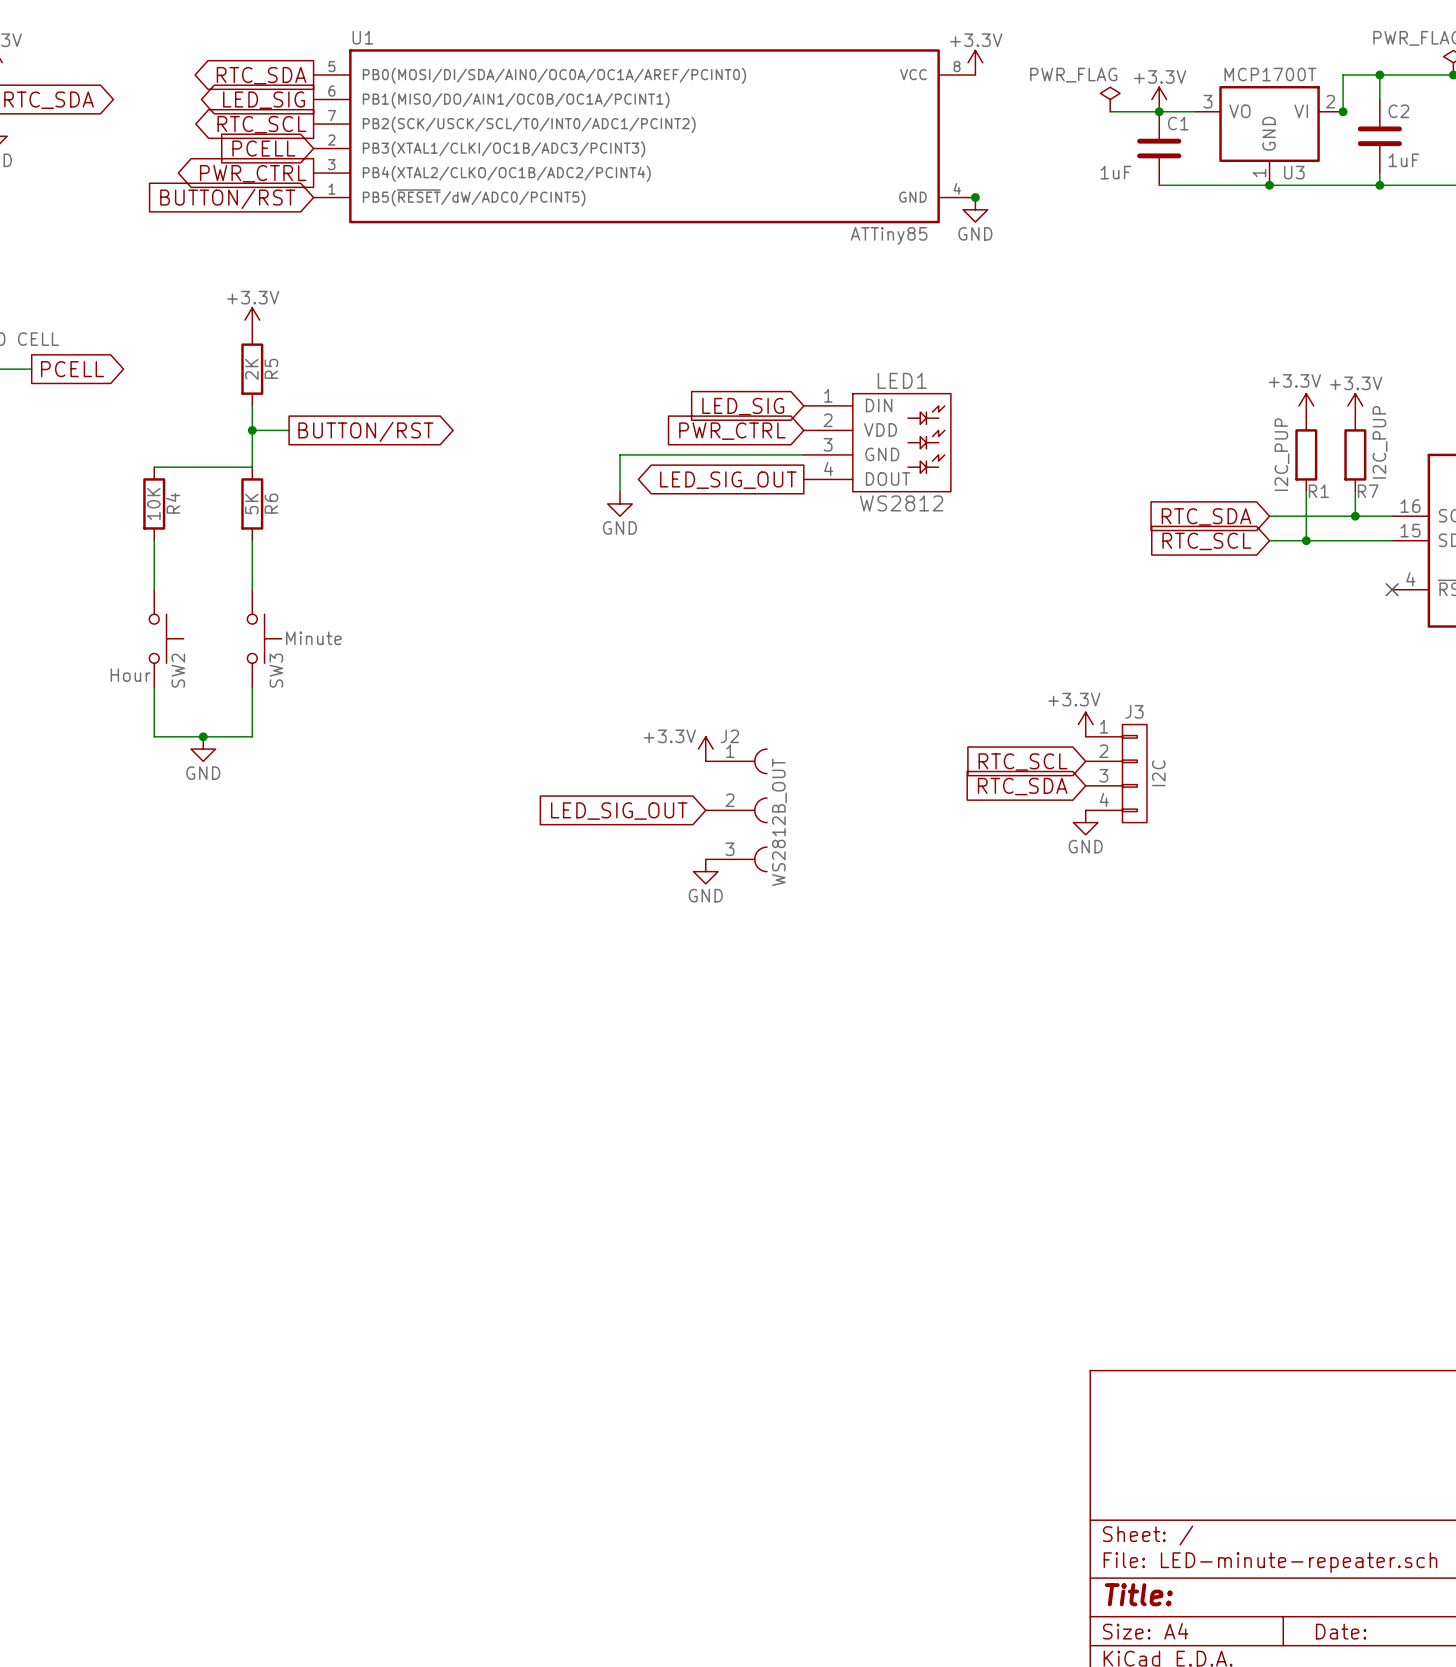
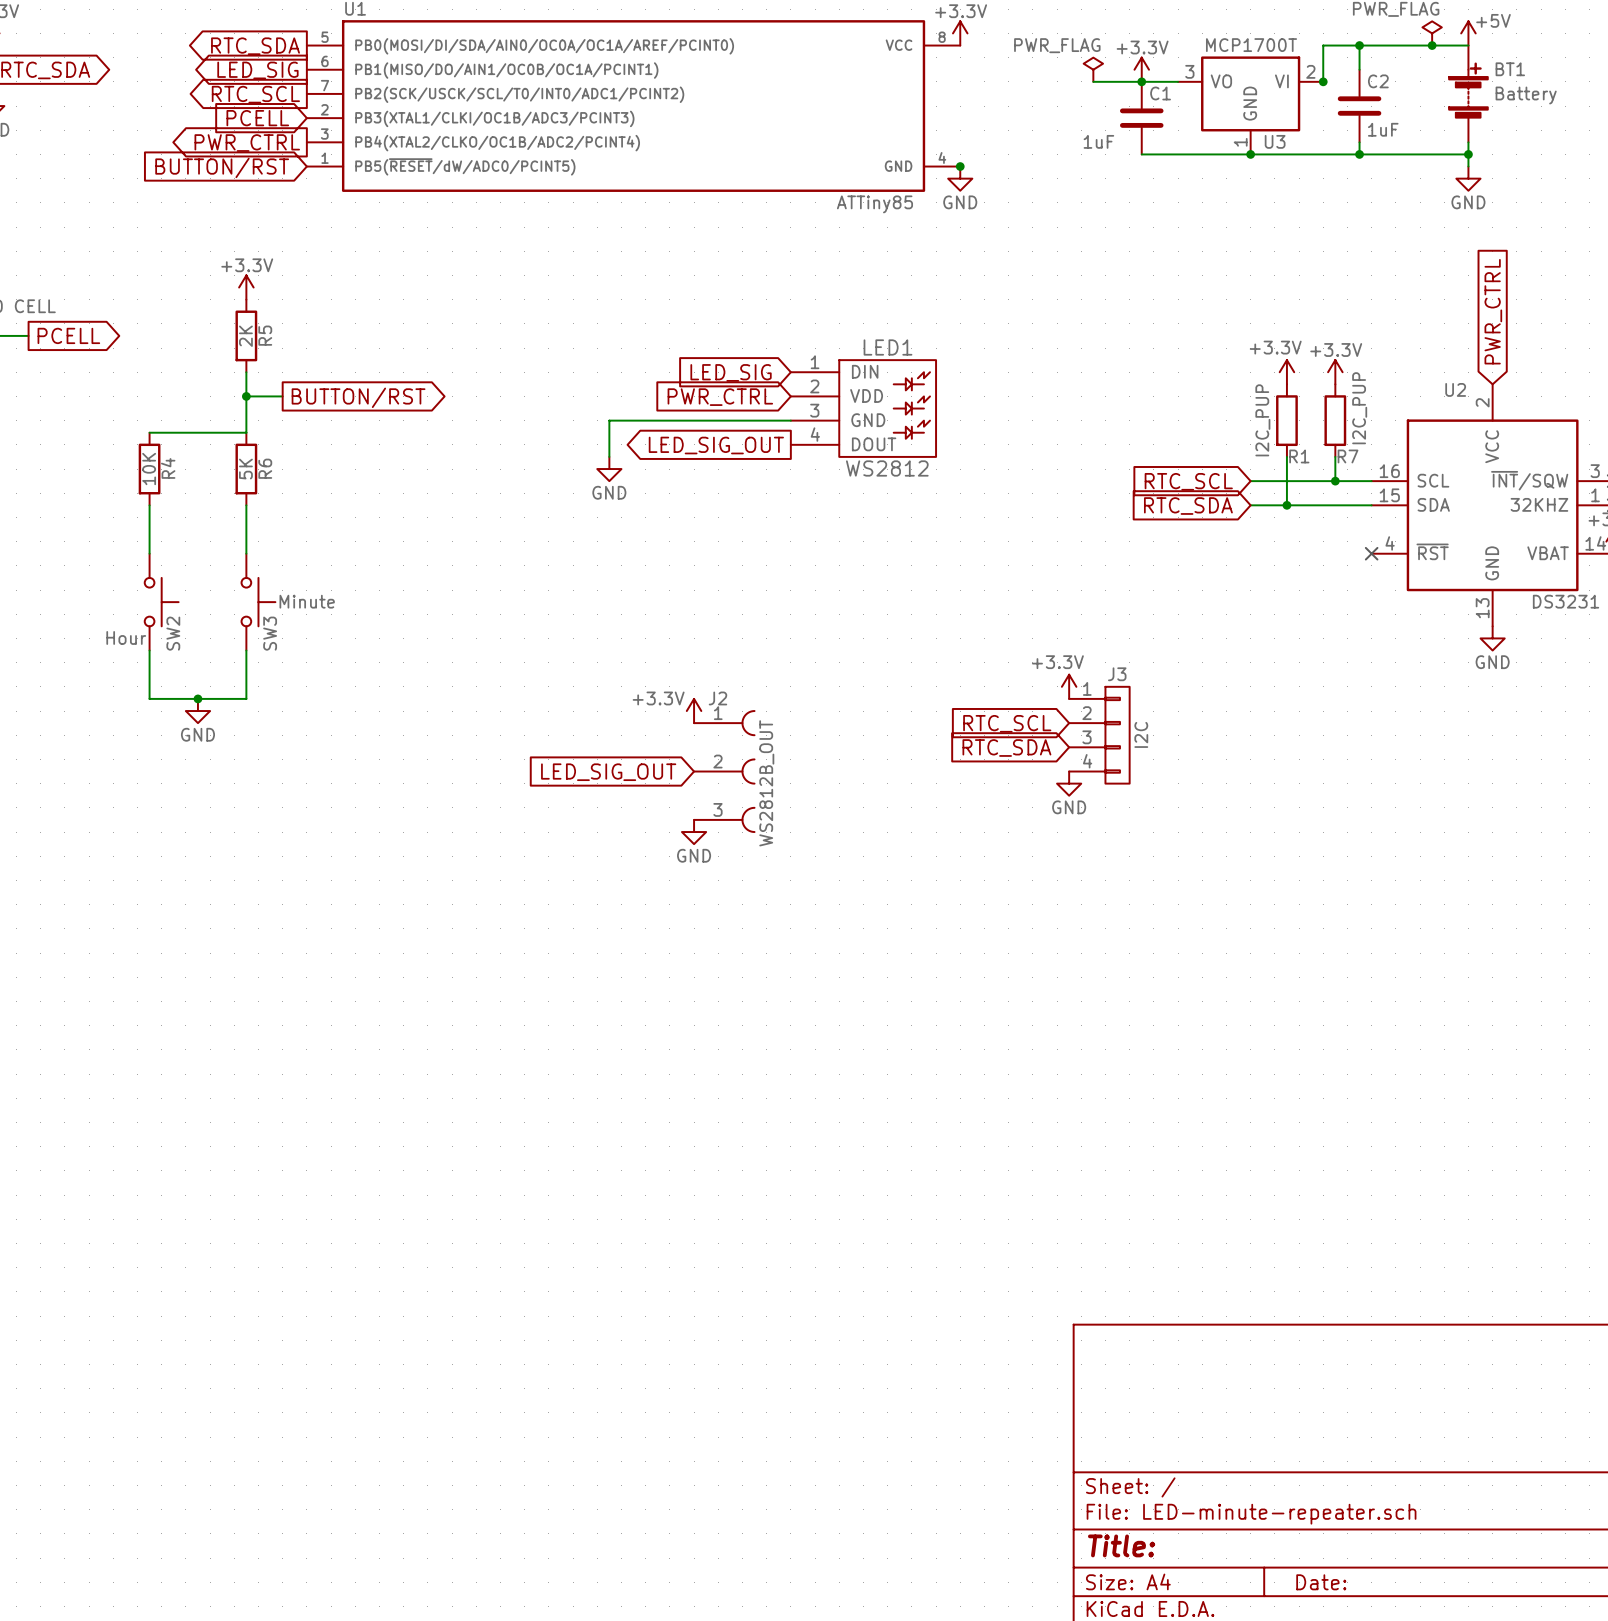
global label: RTC_SDA (1206, 516) -> RTC_SCL (1188, 481)
global label: RTC_SCL (1206, 541) -> RTC_SDA (1188, 506)

